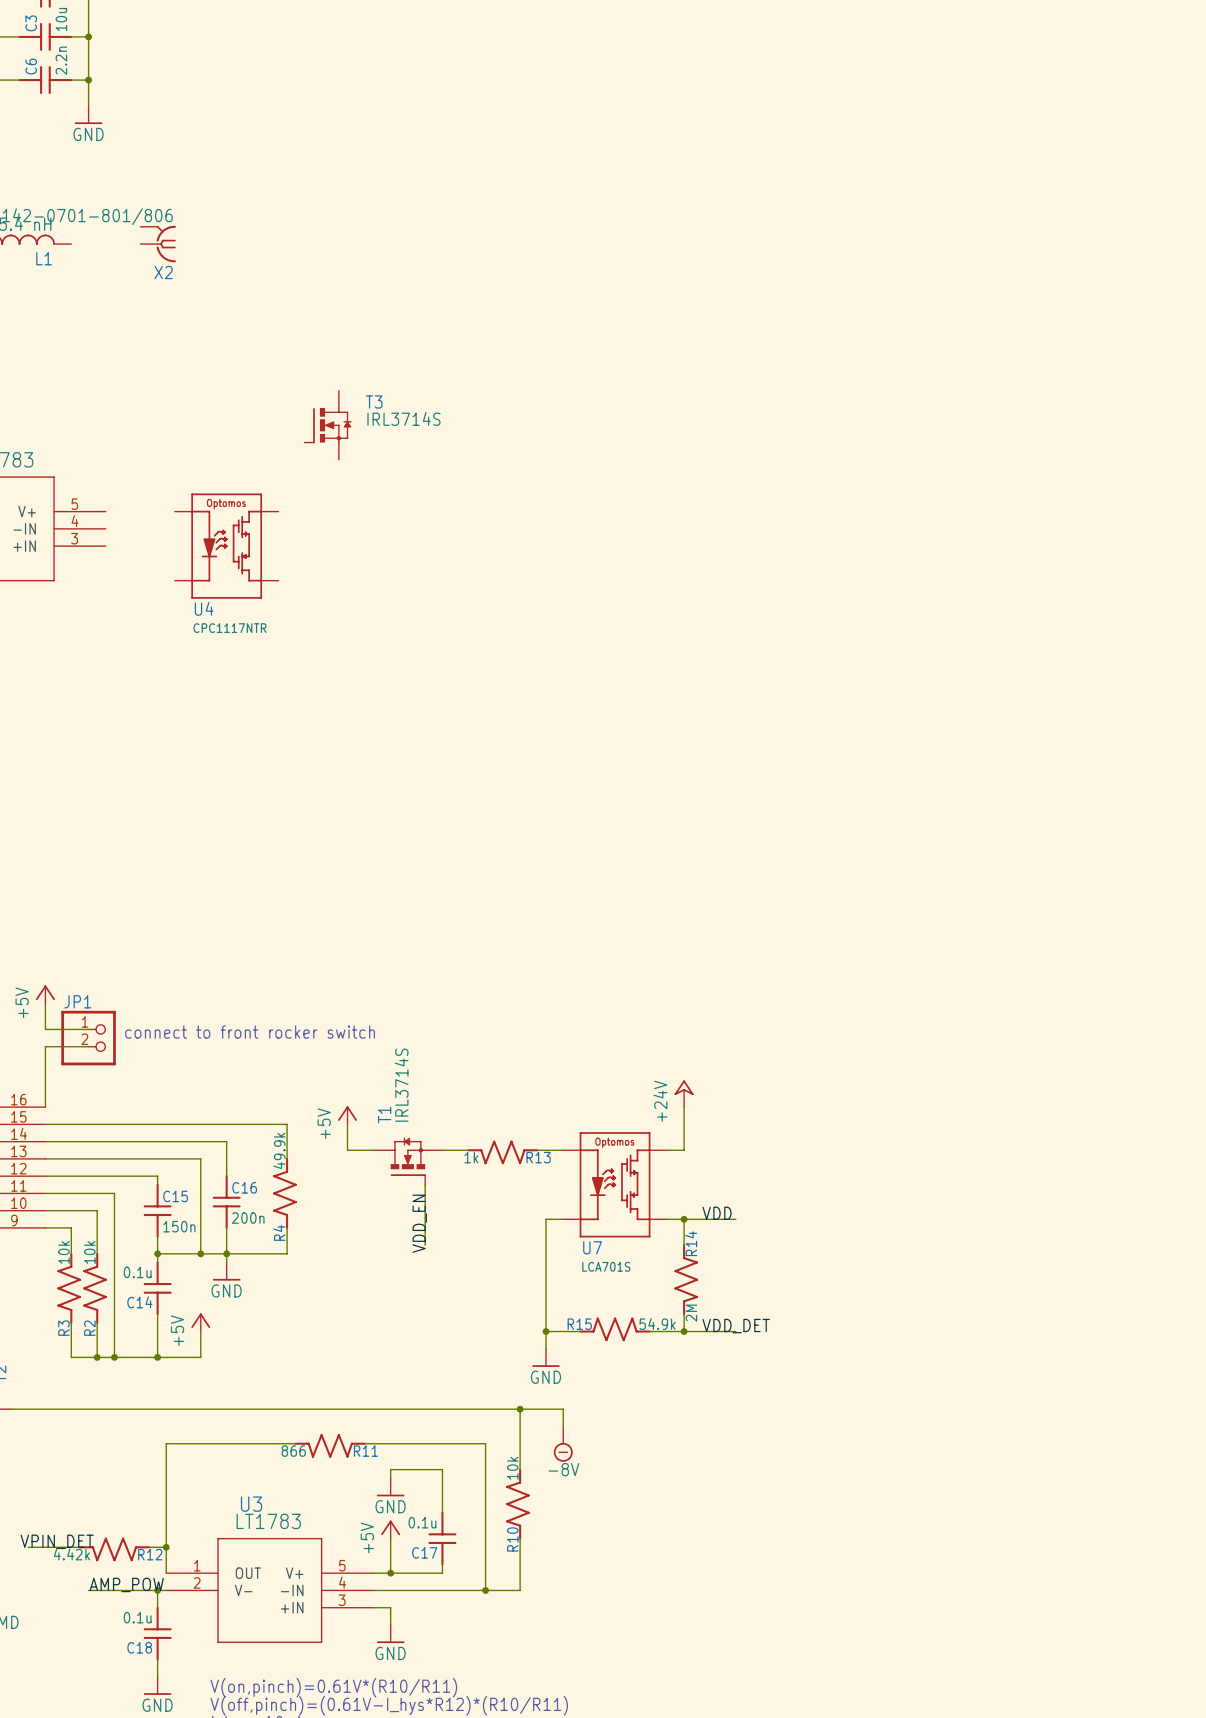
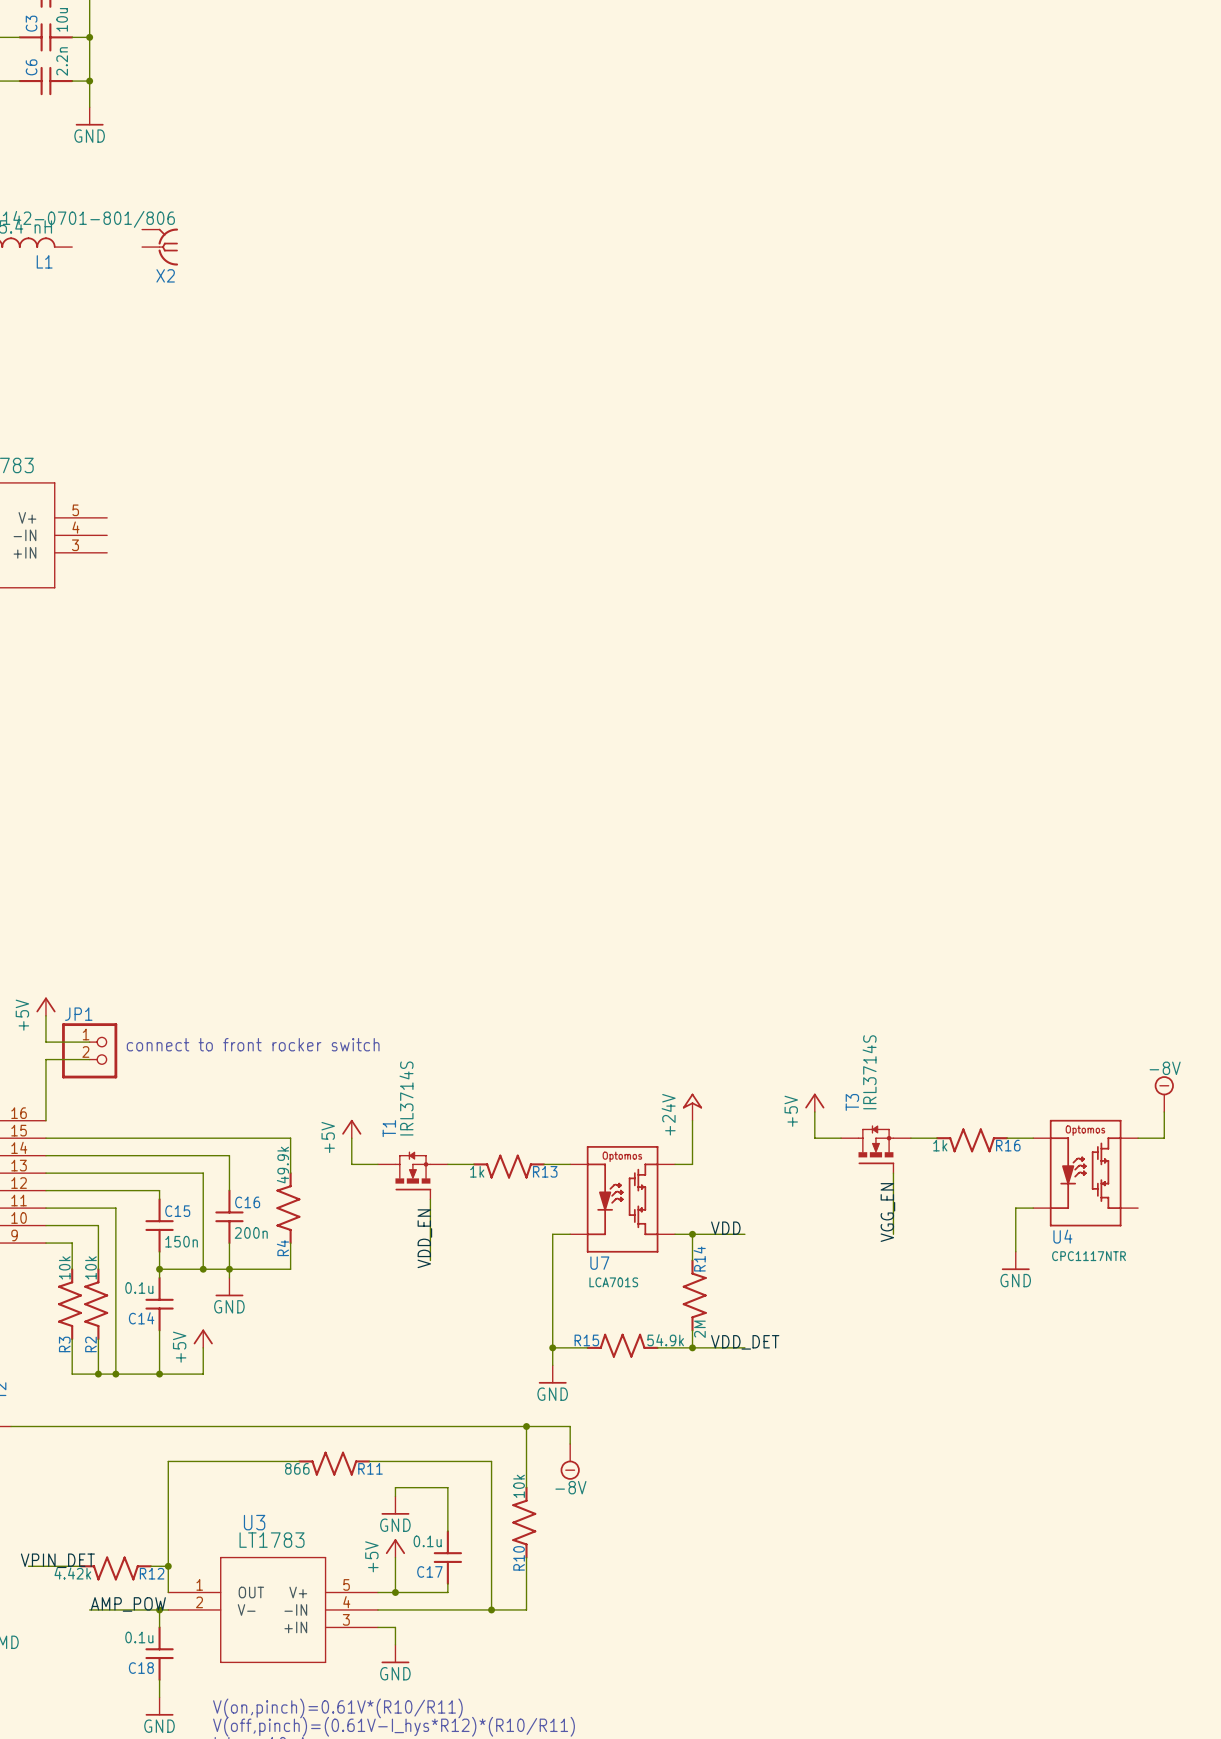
T3 rotation: 0° (327, 425) -> 90° counterclockwise (876, 1149)
T3 position: (327, 425) -> (875, 1149)
U4 position: (226, 546) -> (1085, 1173)
power symbol: none -> -8V (1164, 1094)
power symbol: none -> +5V (814, 1102)
wire: none -> (814, 1111) (814, 1138) (841, 1138)
wire: none -> (1164, 1111) (1164, 1138) (1138, 1138)
wire: none -> (910, 1138) (937, 1138)
wire: none -> (1007, 1138) (1033, 1138)
R16: none -> 1k (972, 1140)
wire: none -> (893, 1173) (893, 1234)
wire: none -> (1033, 1208) (1015, 1208) (1015, 1251)
label: none -> VGG_EN (887, 1212)
power symbol: none -> GND (1015, 1260)

